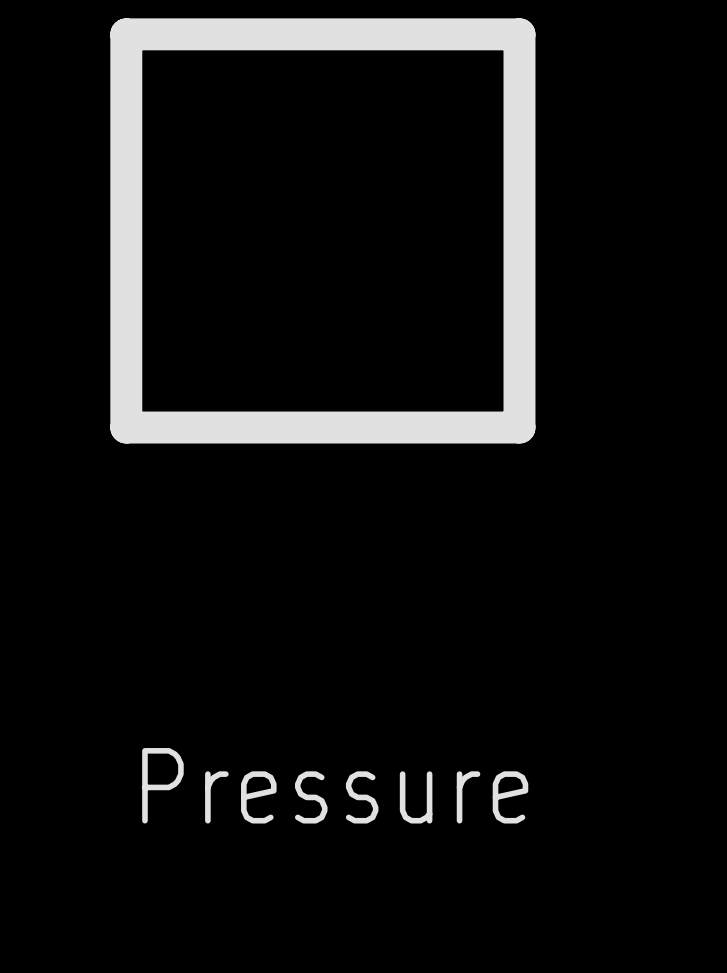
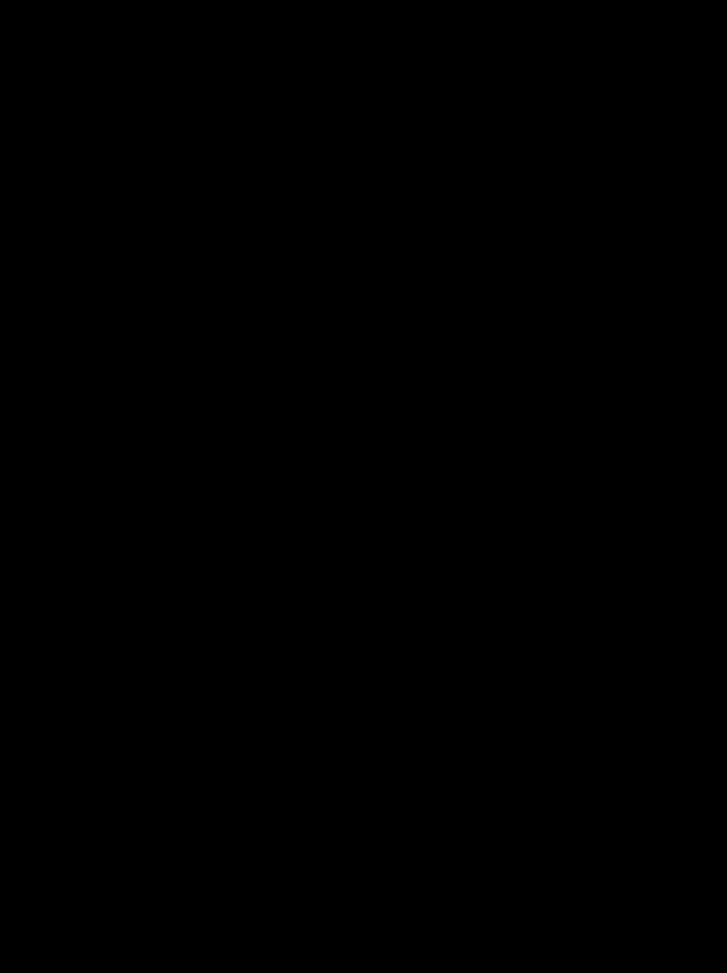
line: (126, 34) (126, 427) (519, 427) (519, 34) (126, 34) -> none
text: Pressure (335, 785) -> none

